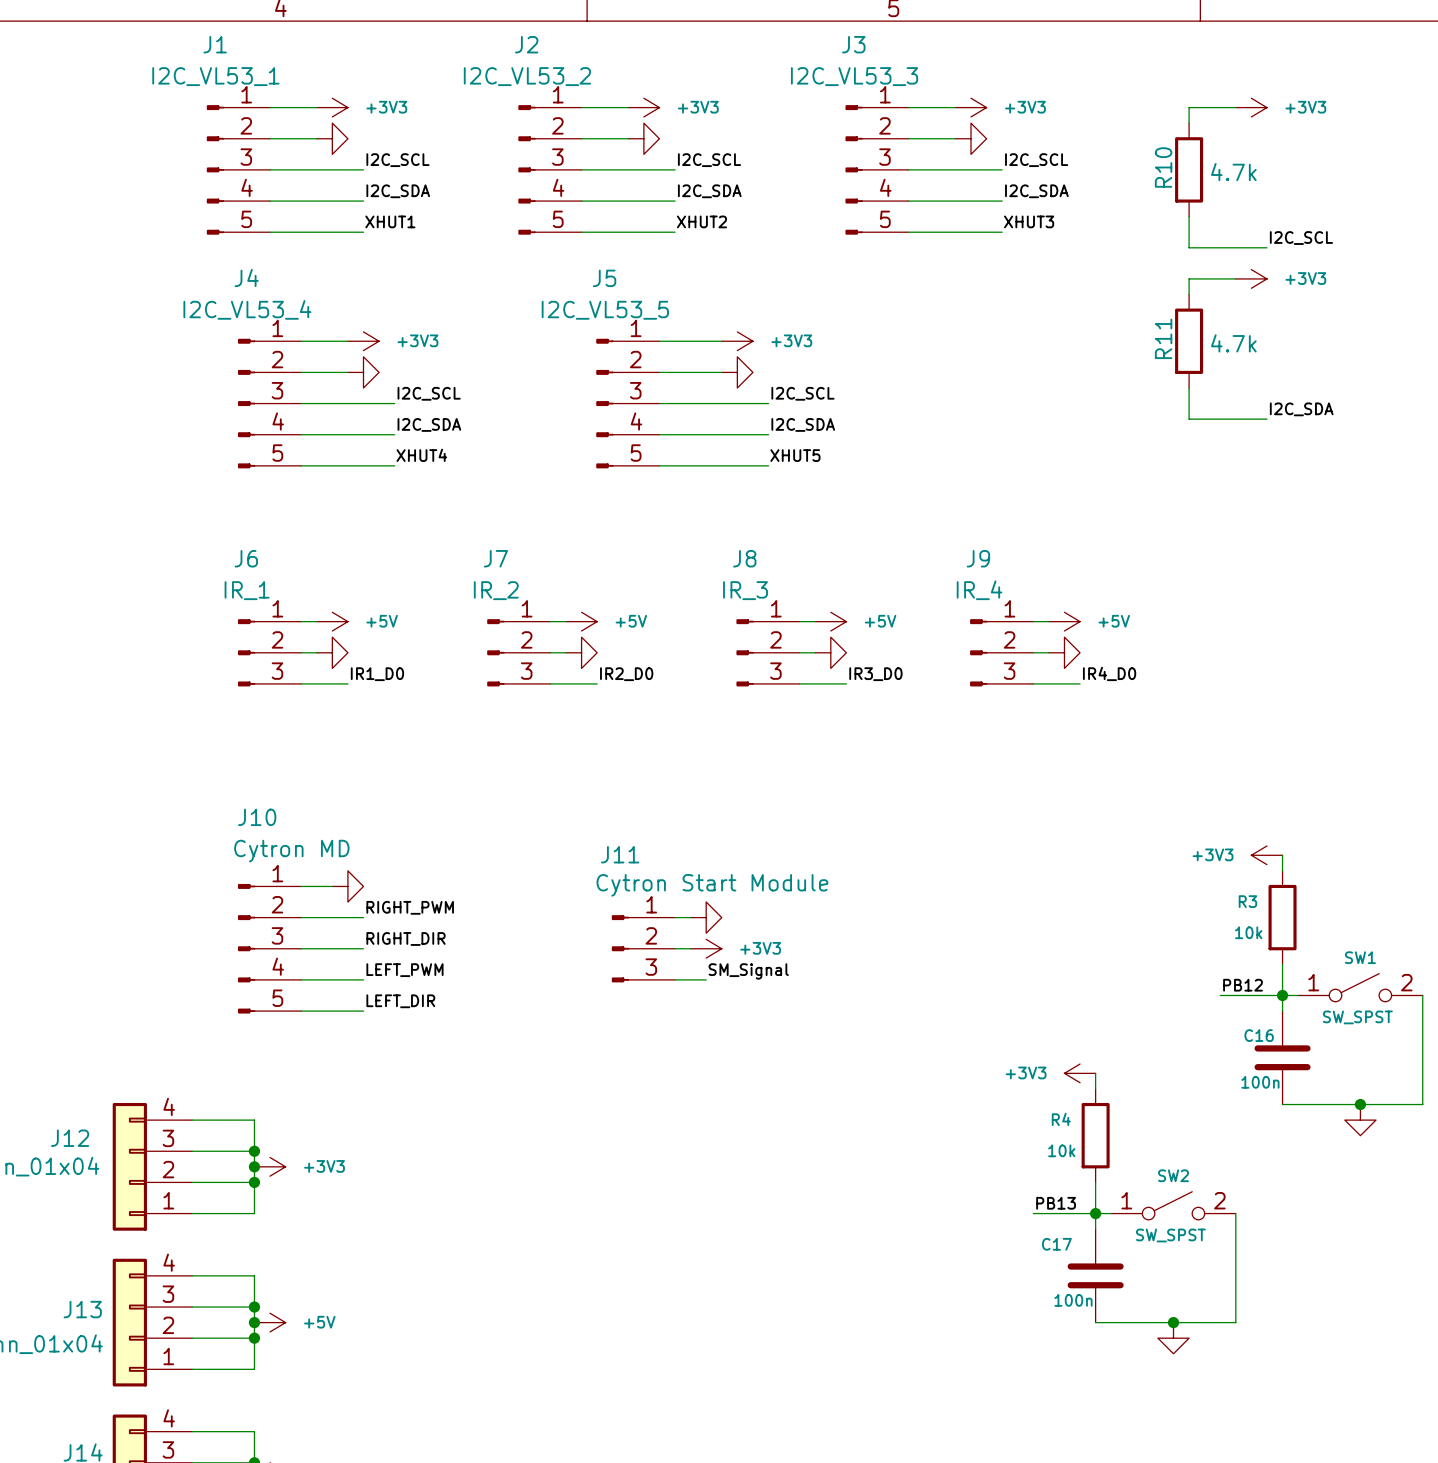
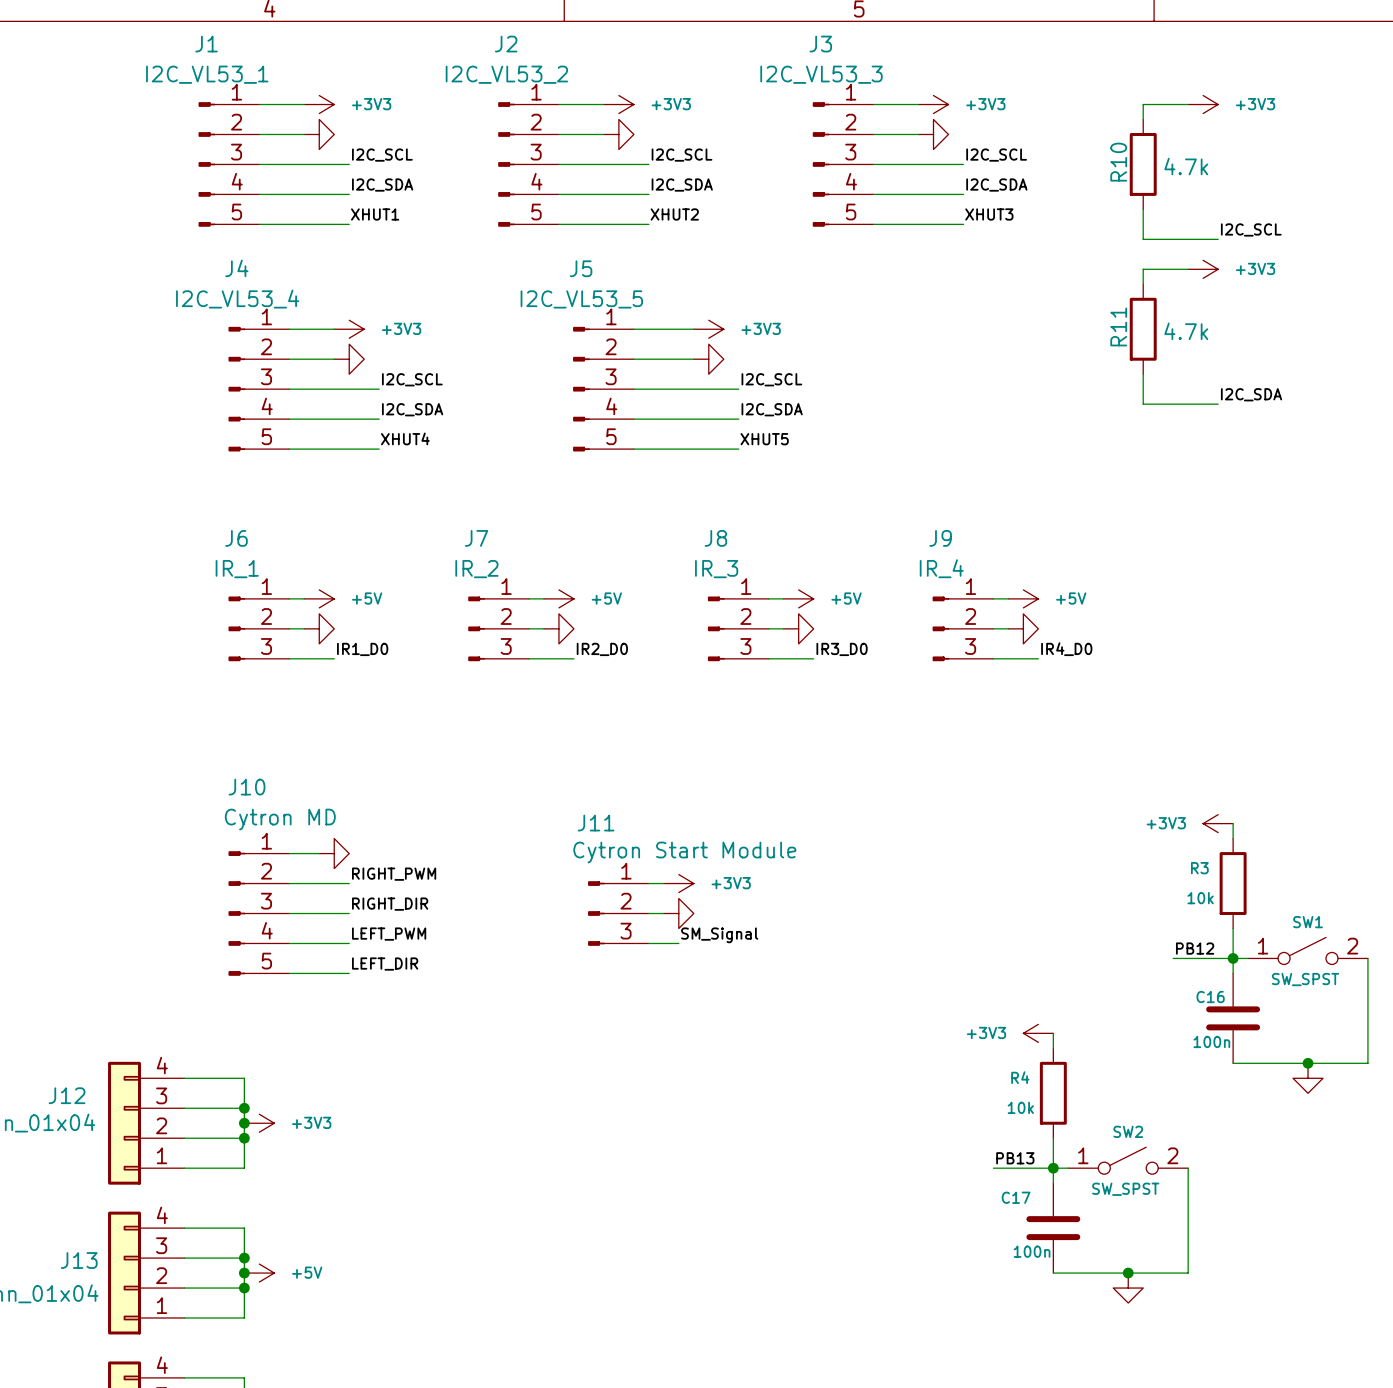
power symbol shape: [690, 902, 722, 934] -> [663, 874, 694, 893]
power symbol text: none -> +3V3 (731, 883)
power symbol shape: [690, 939, 722, 959] -> [663, 898, 694, 929]
power symbol text: +3V3 (760, 948) -> none

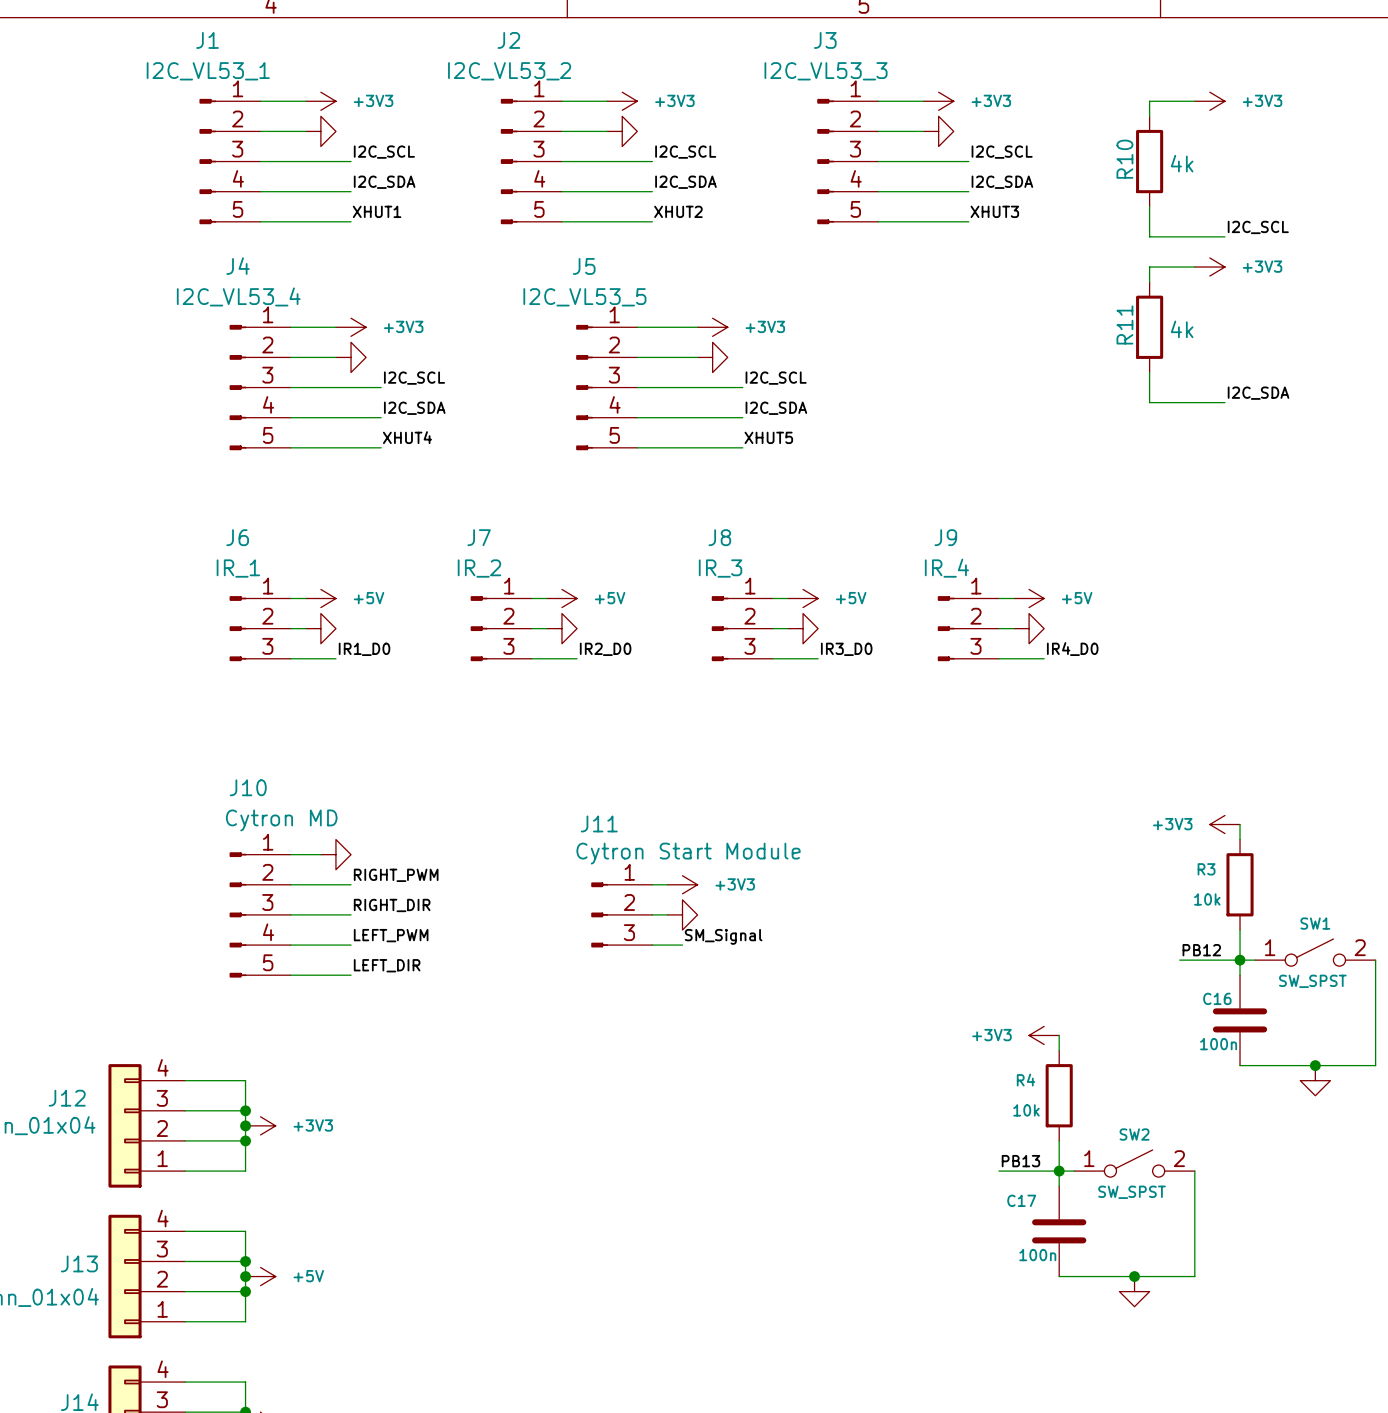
R10 value: 4.7k (1186, 166) -> 4k (1182, 163)
R11 value: 4.7k (1186, 331) -> 4k (1182, 329)

